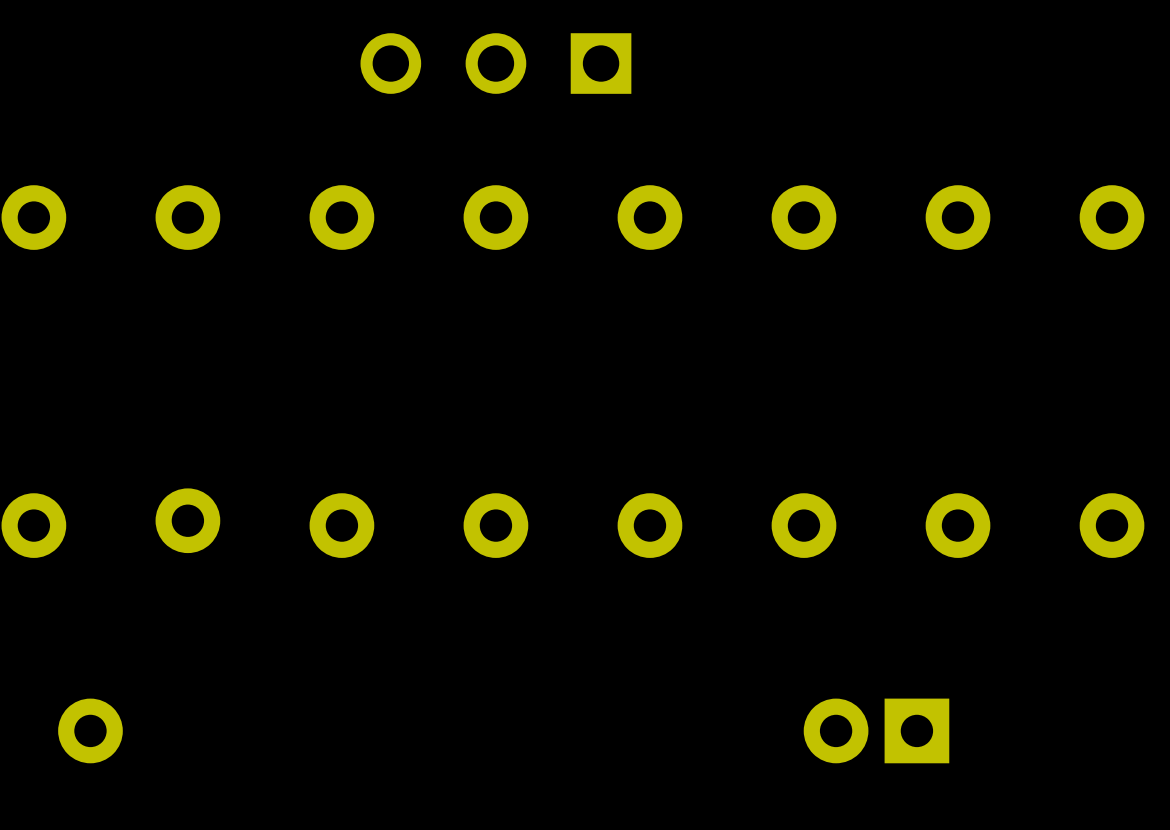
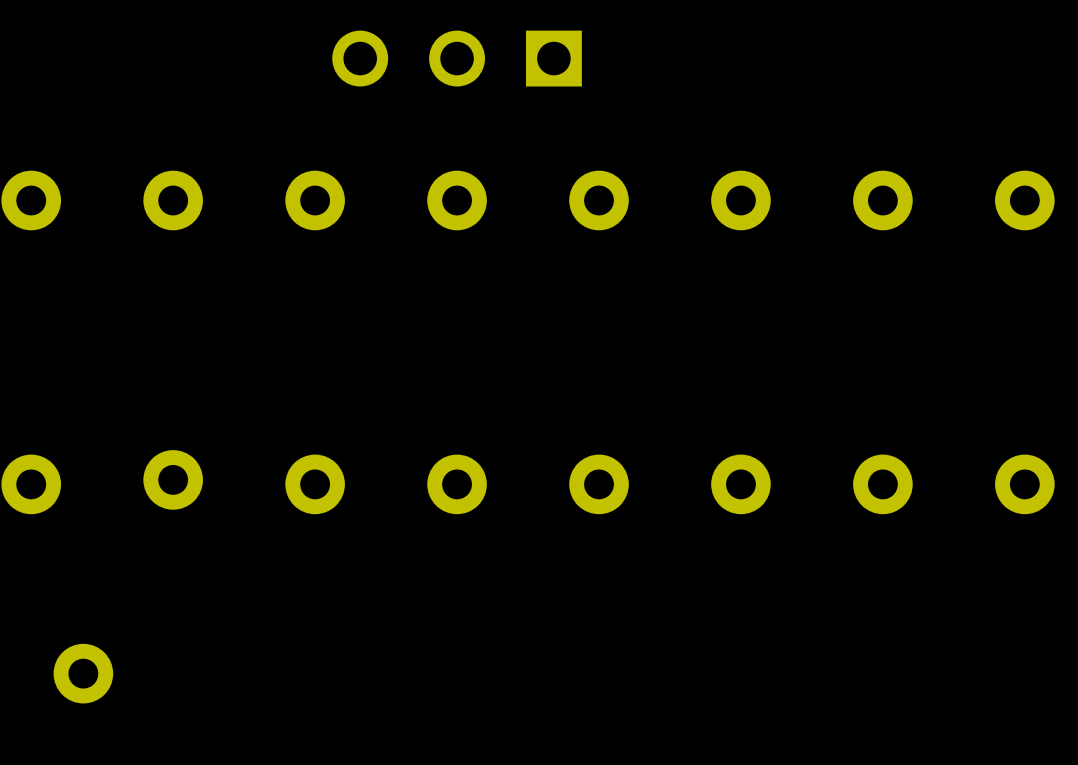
part: (876, 730) -> none

